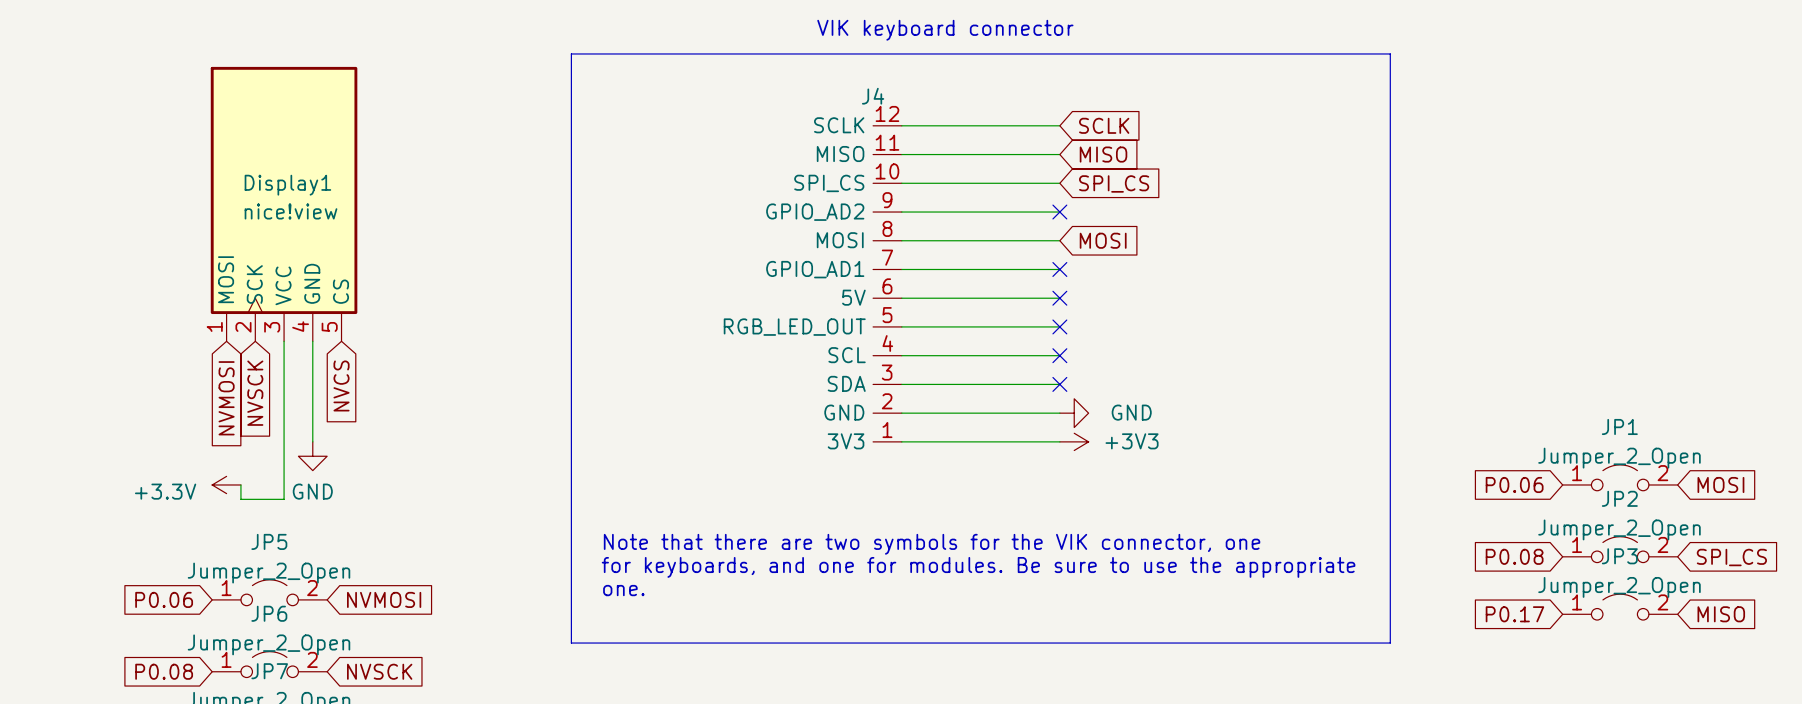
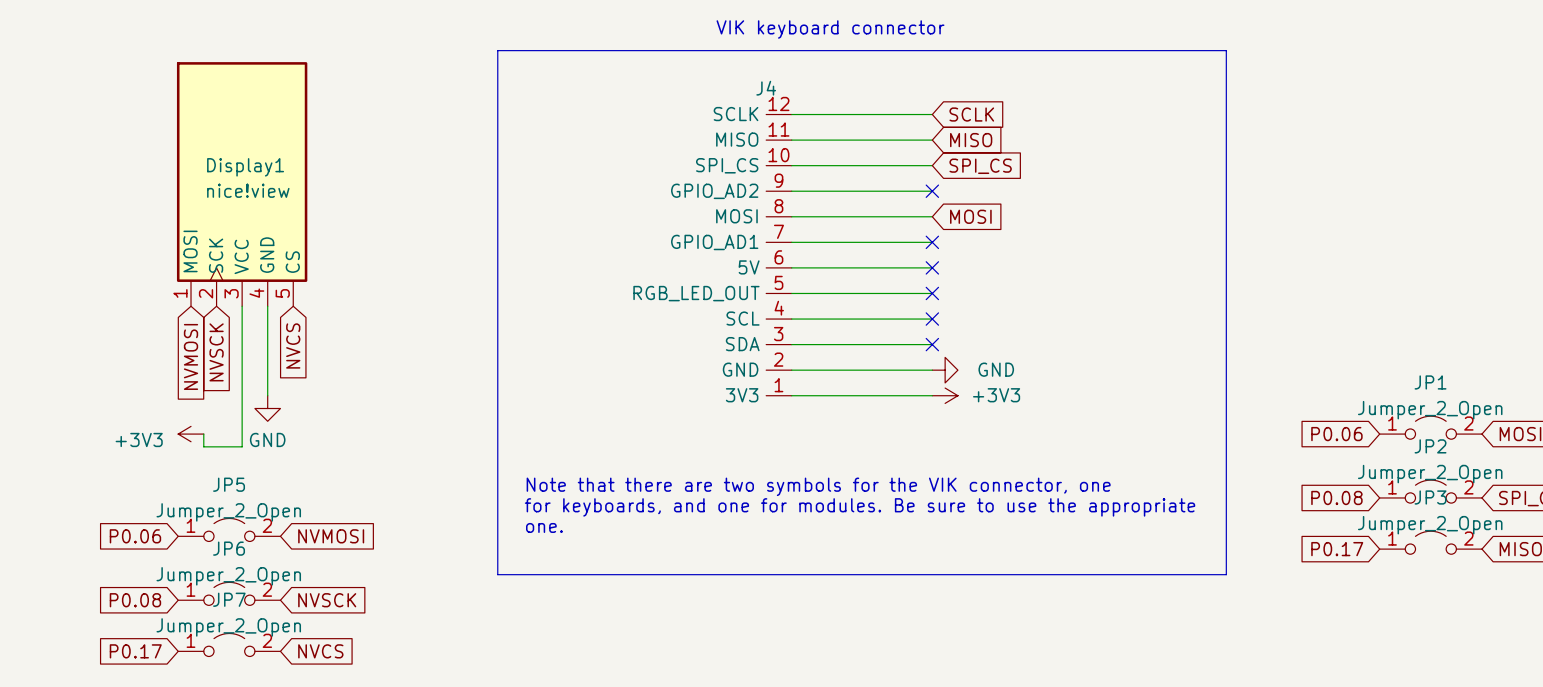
power symbol: +3.3V (226, 484) -> +3V3 (191, 434)

